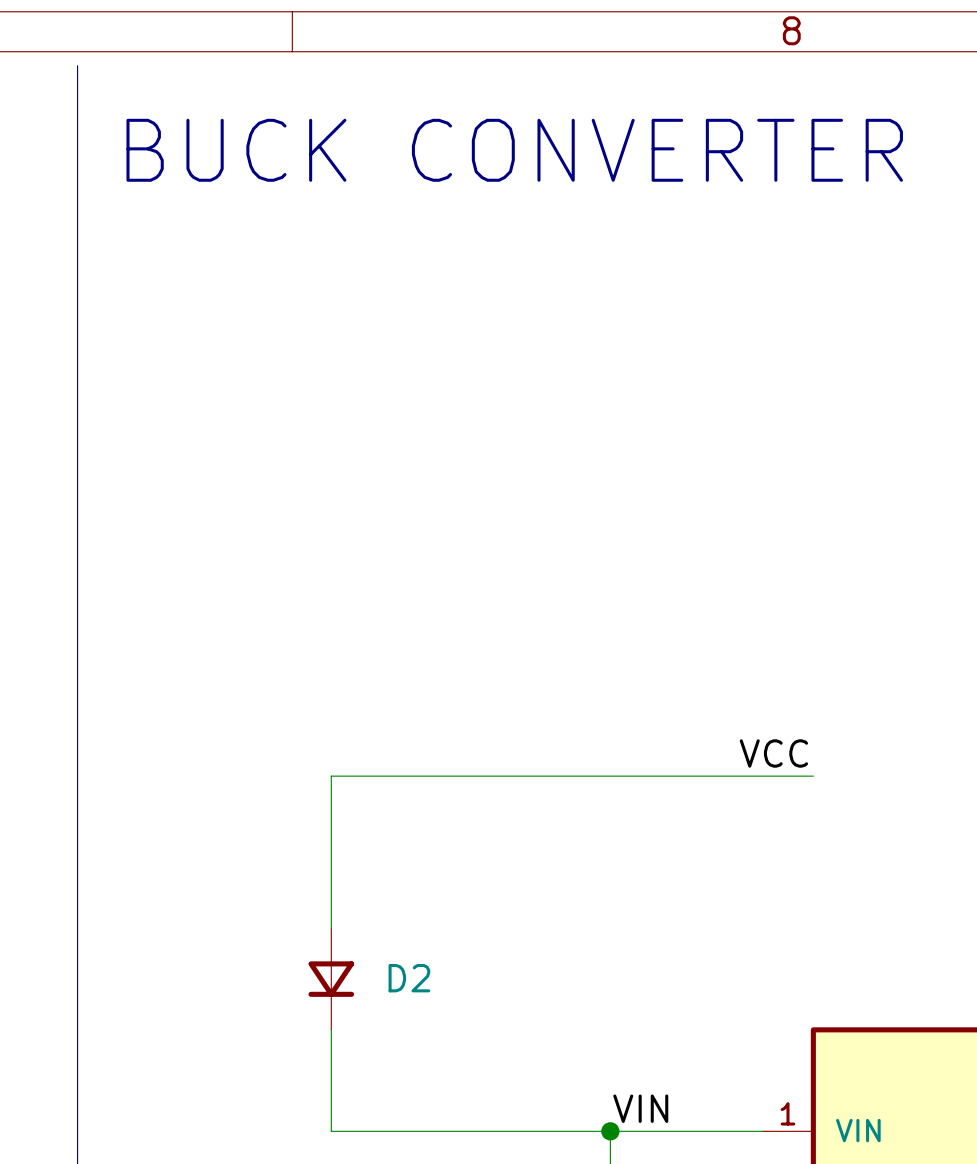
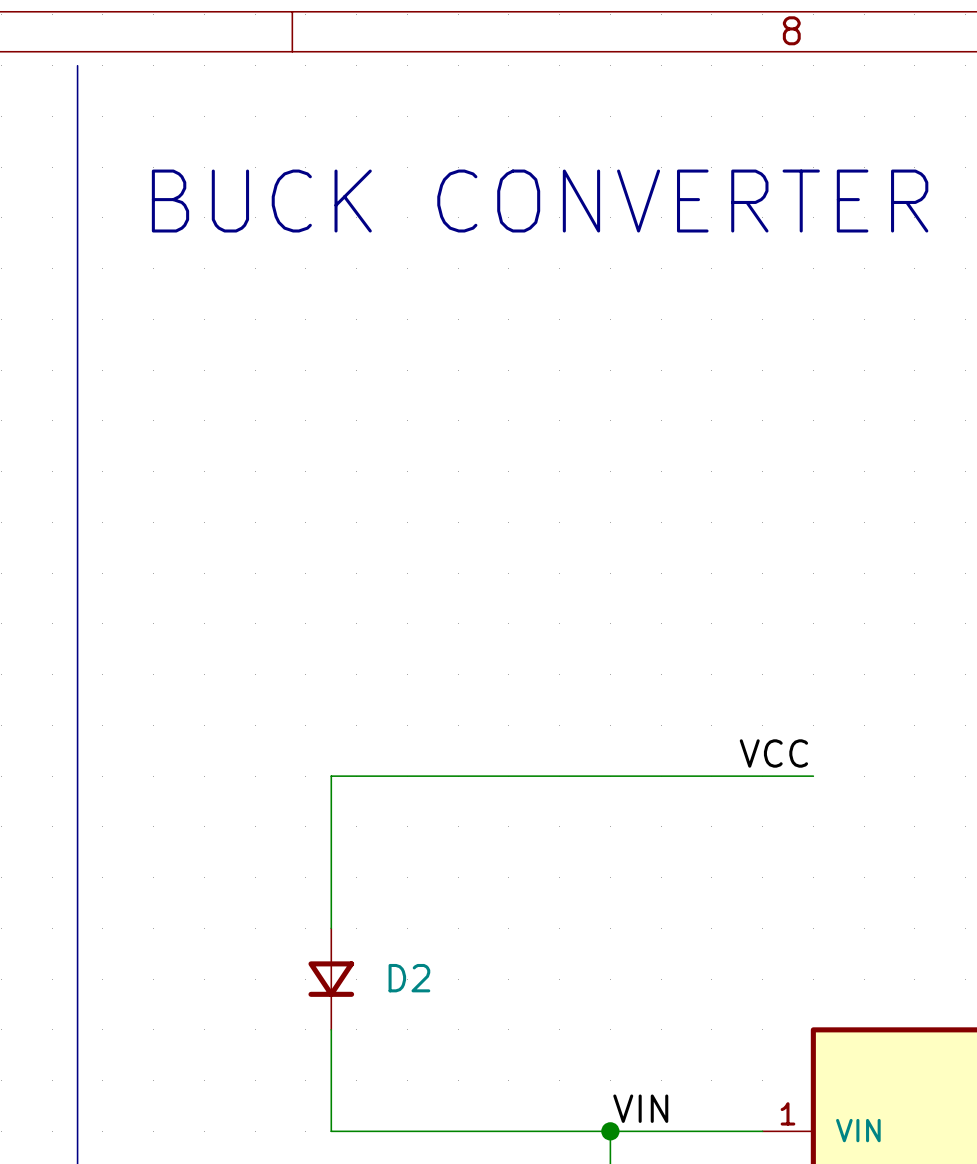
text position: BUCK CONVERTER (514, 150) -> BUCK CONVERTER (540, 201)

